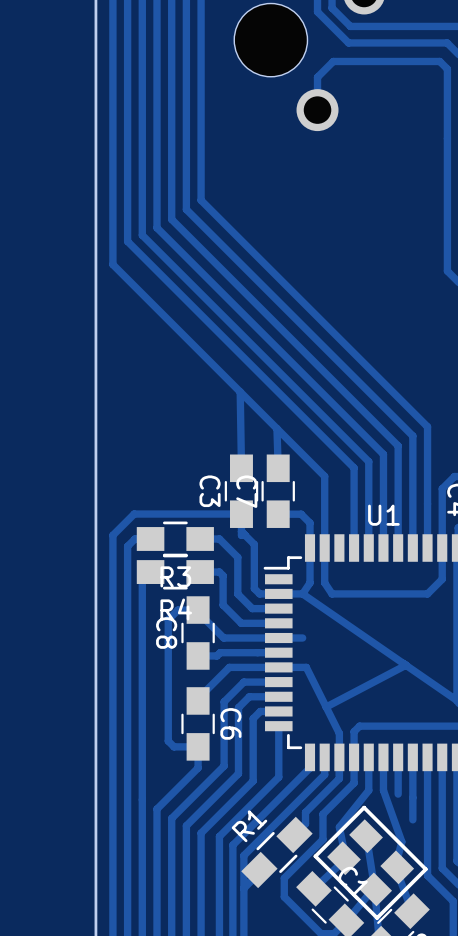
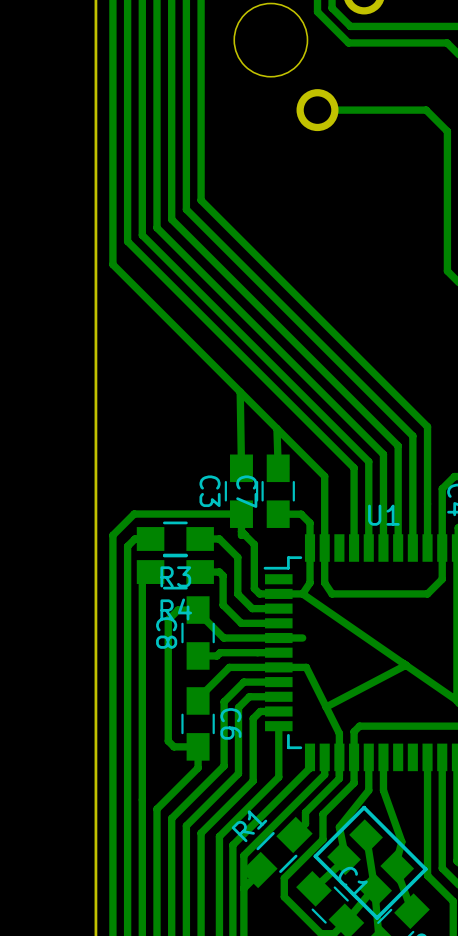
track: (317, 110) (317, 77) (333, 61) (439, 61) (447, 69) (447, 131) -> (317, 110) (426, 110) (447, 131)
track: (398, 757) (398, 794) -> none
track: (412, 757) (412, 819) -> none

